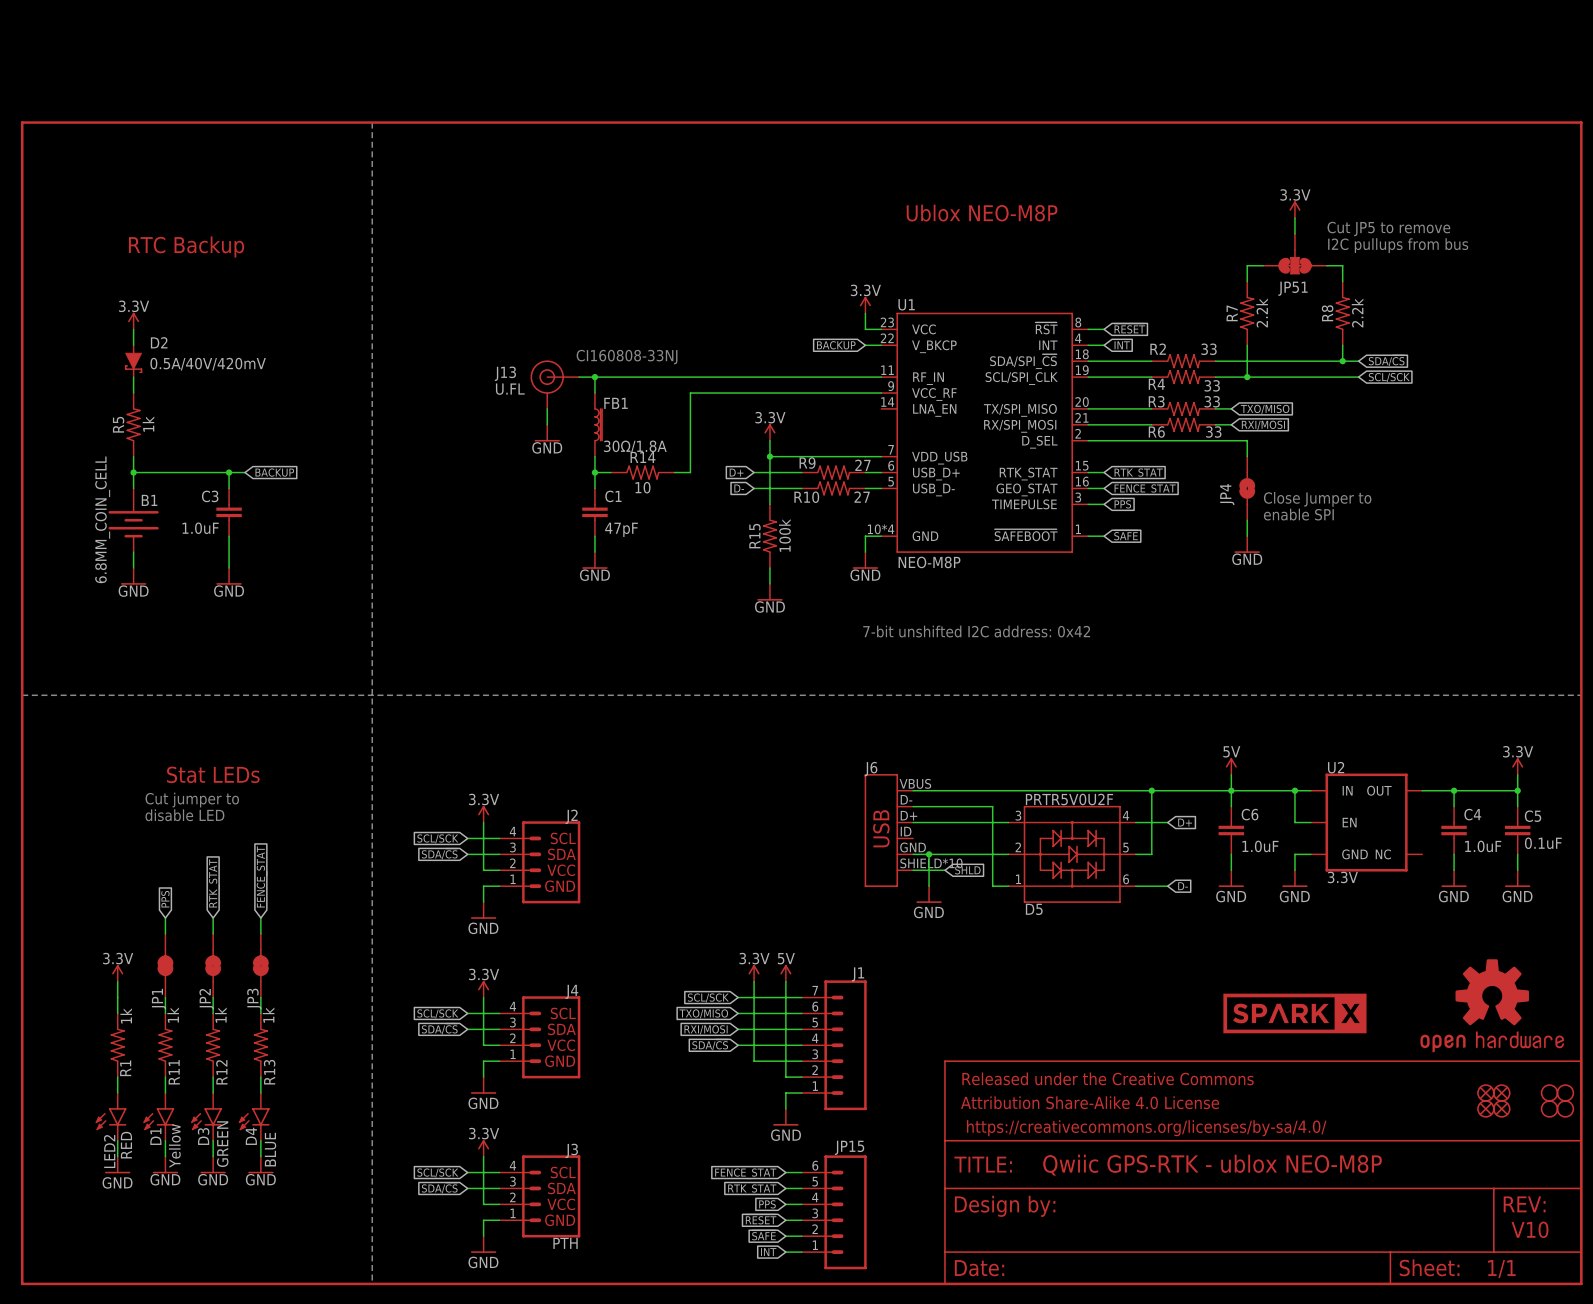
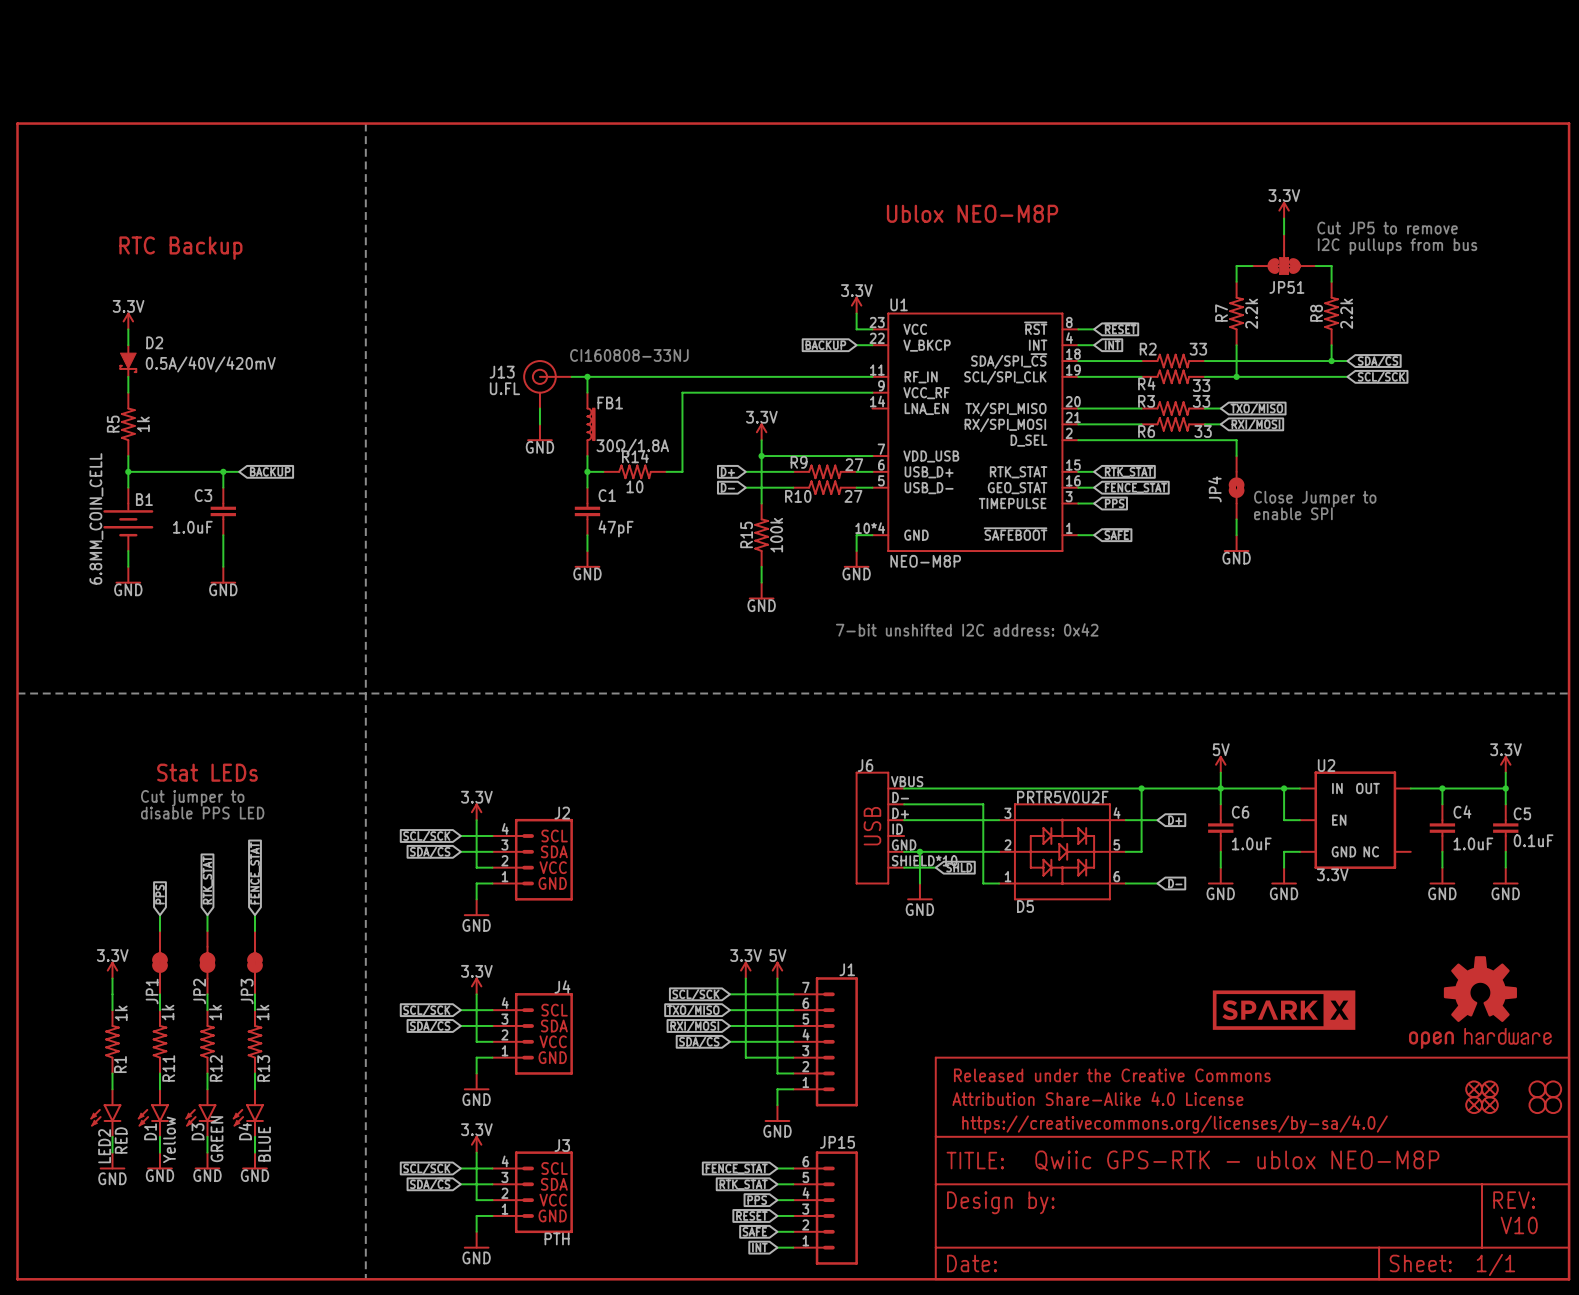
text: disable LED (184, 815) -> disable PPS LED (202, 813)

